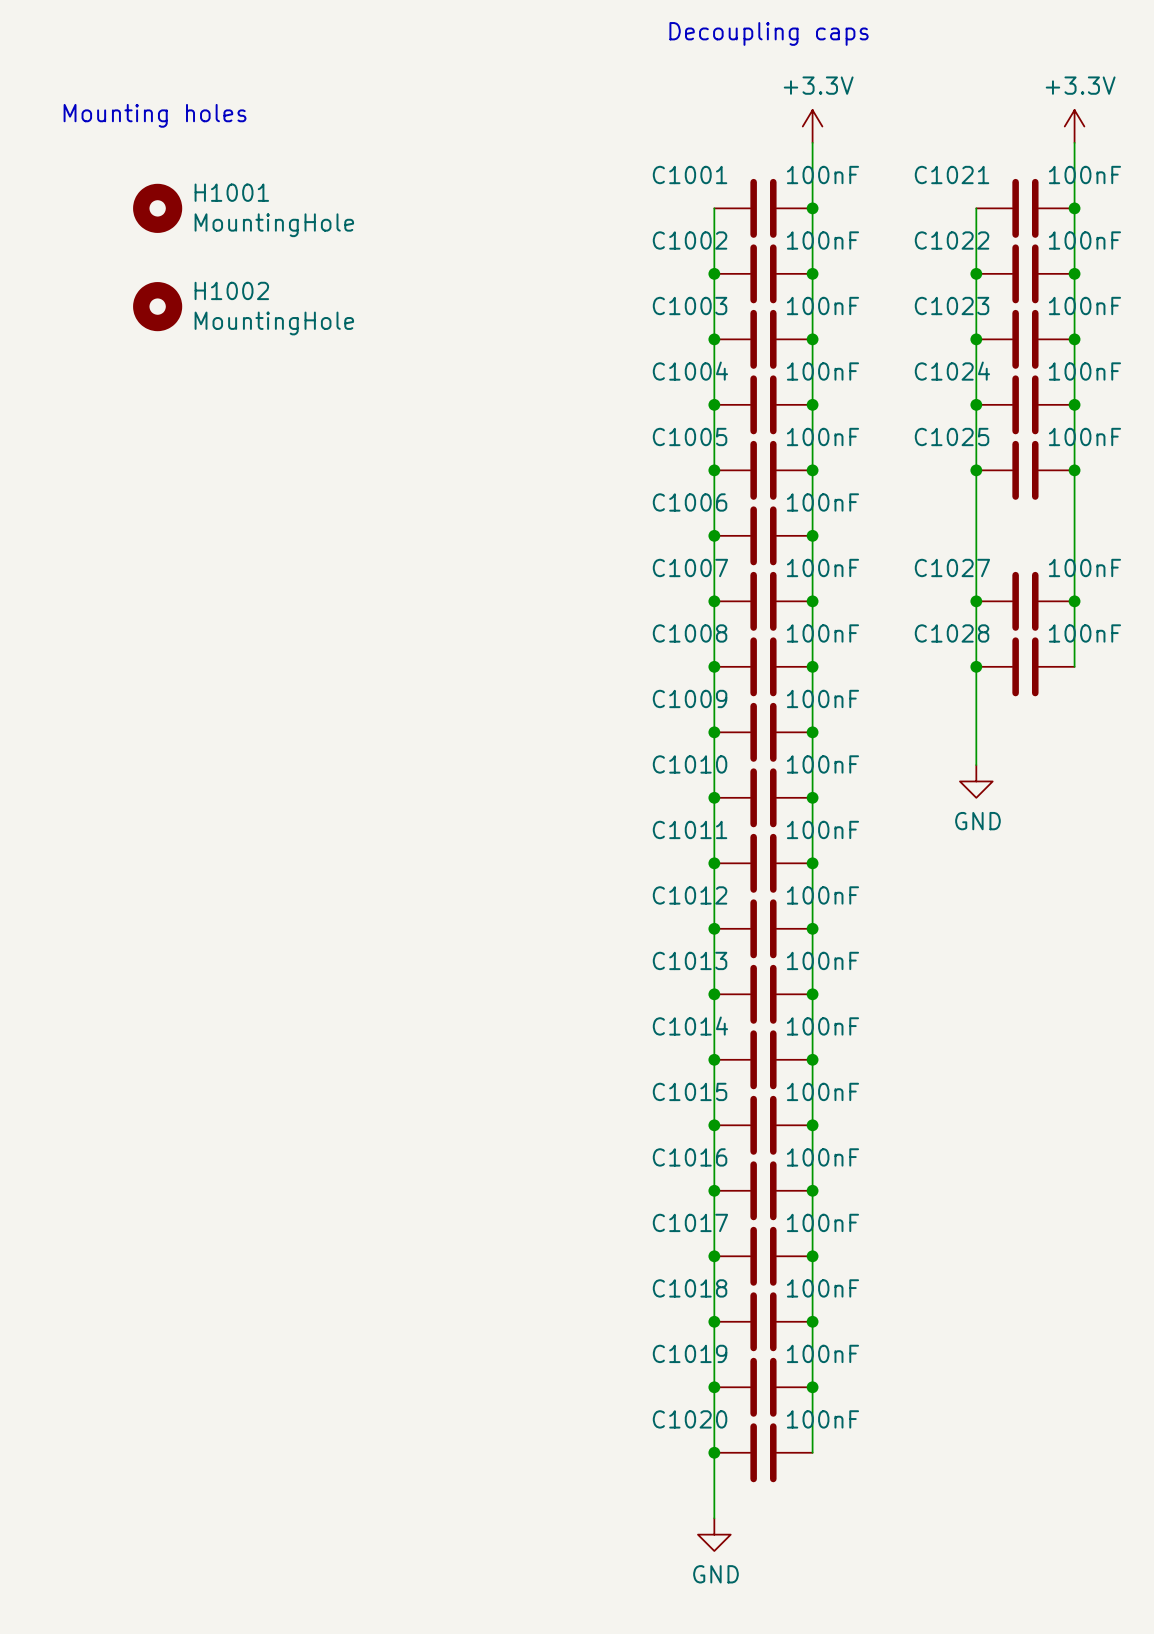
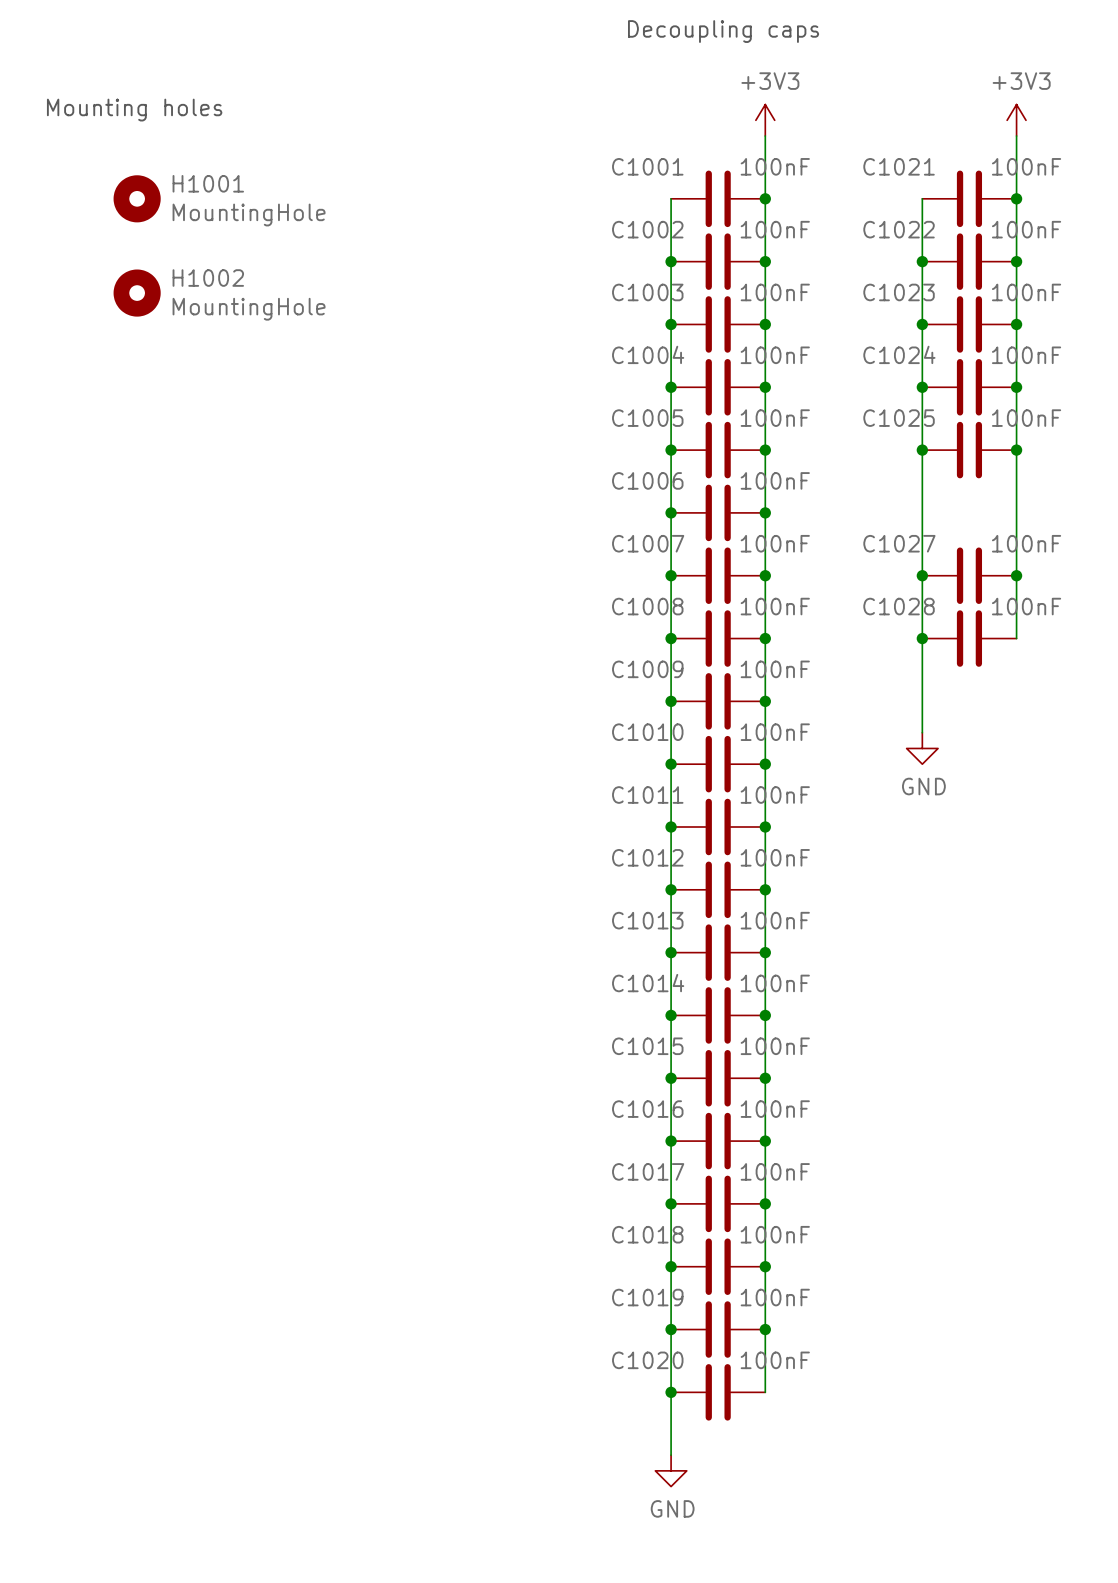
power symbol: +3.3V (812, 126) -> +3V3 (765, 120)
power symbol: +3.3V (1074, 126) -> +3V3 (1016, 120)

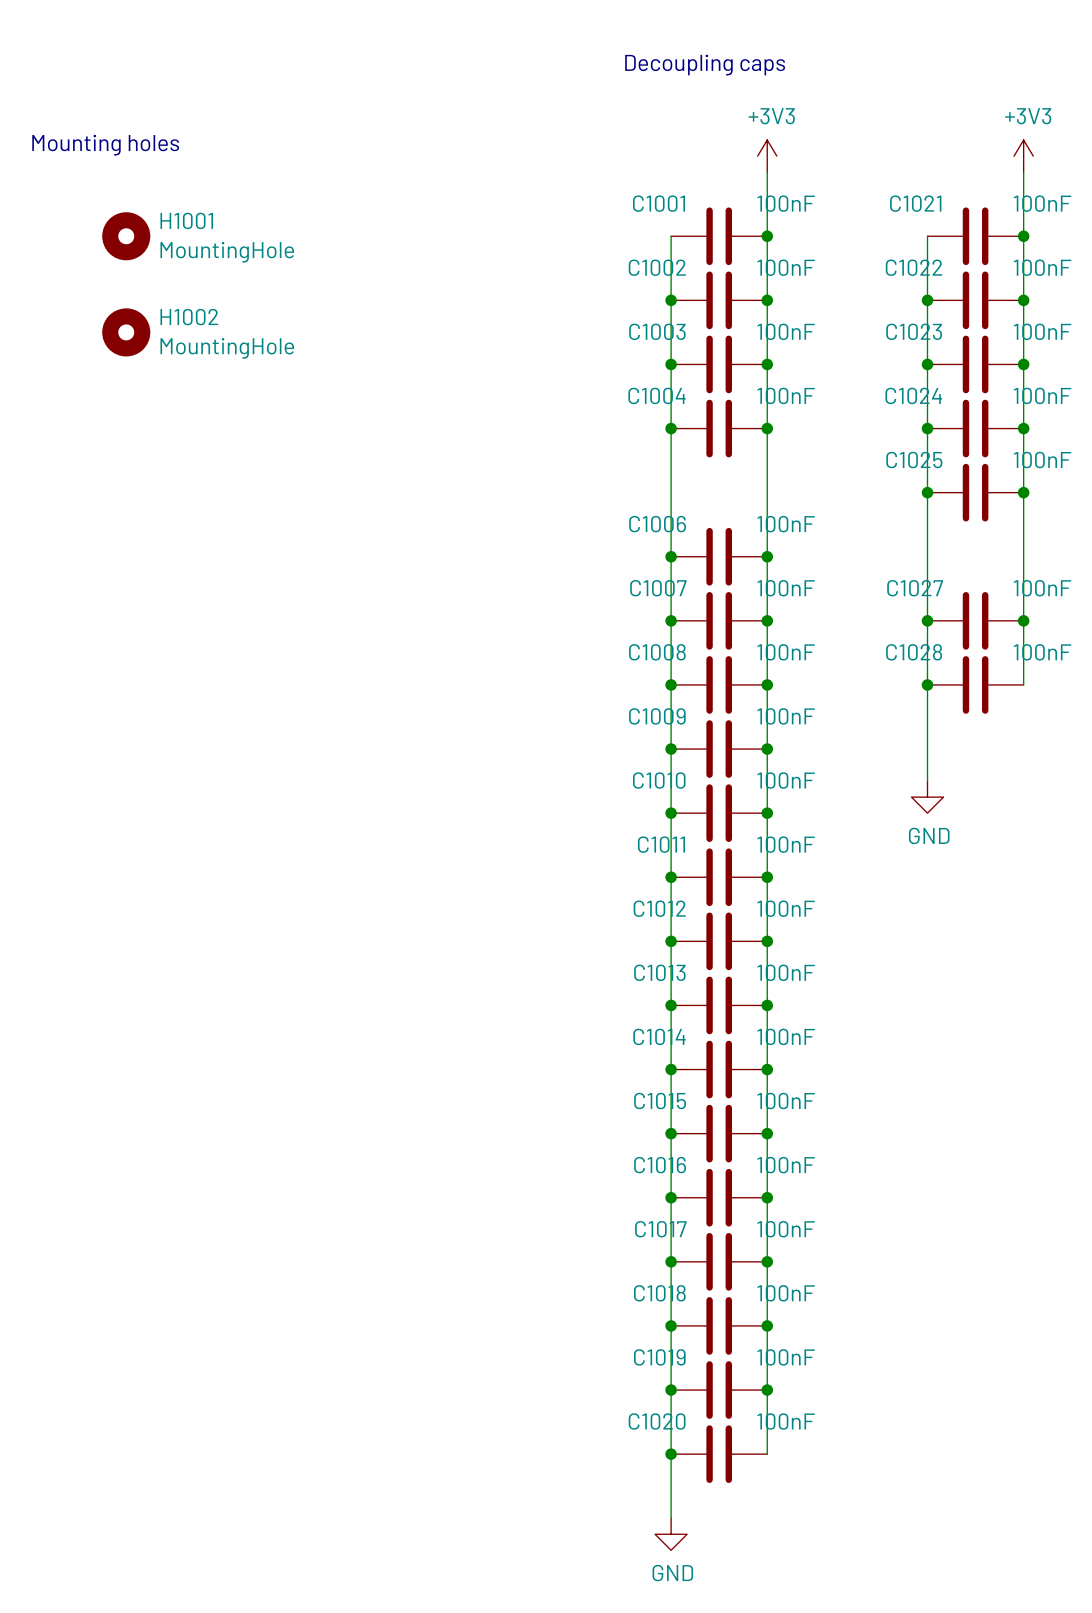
junction: (671, 450) -> none
C1005: 100nF (718, 450) -> none
junction: (765, 450) -> none

